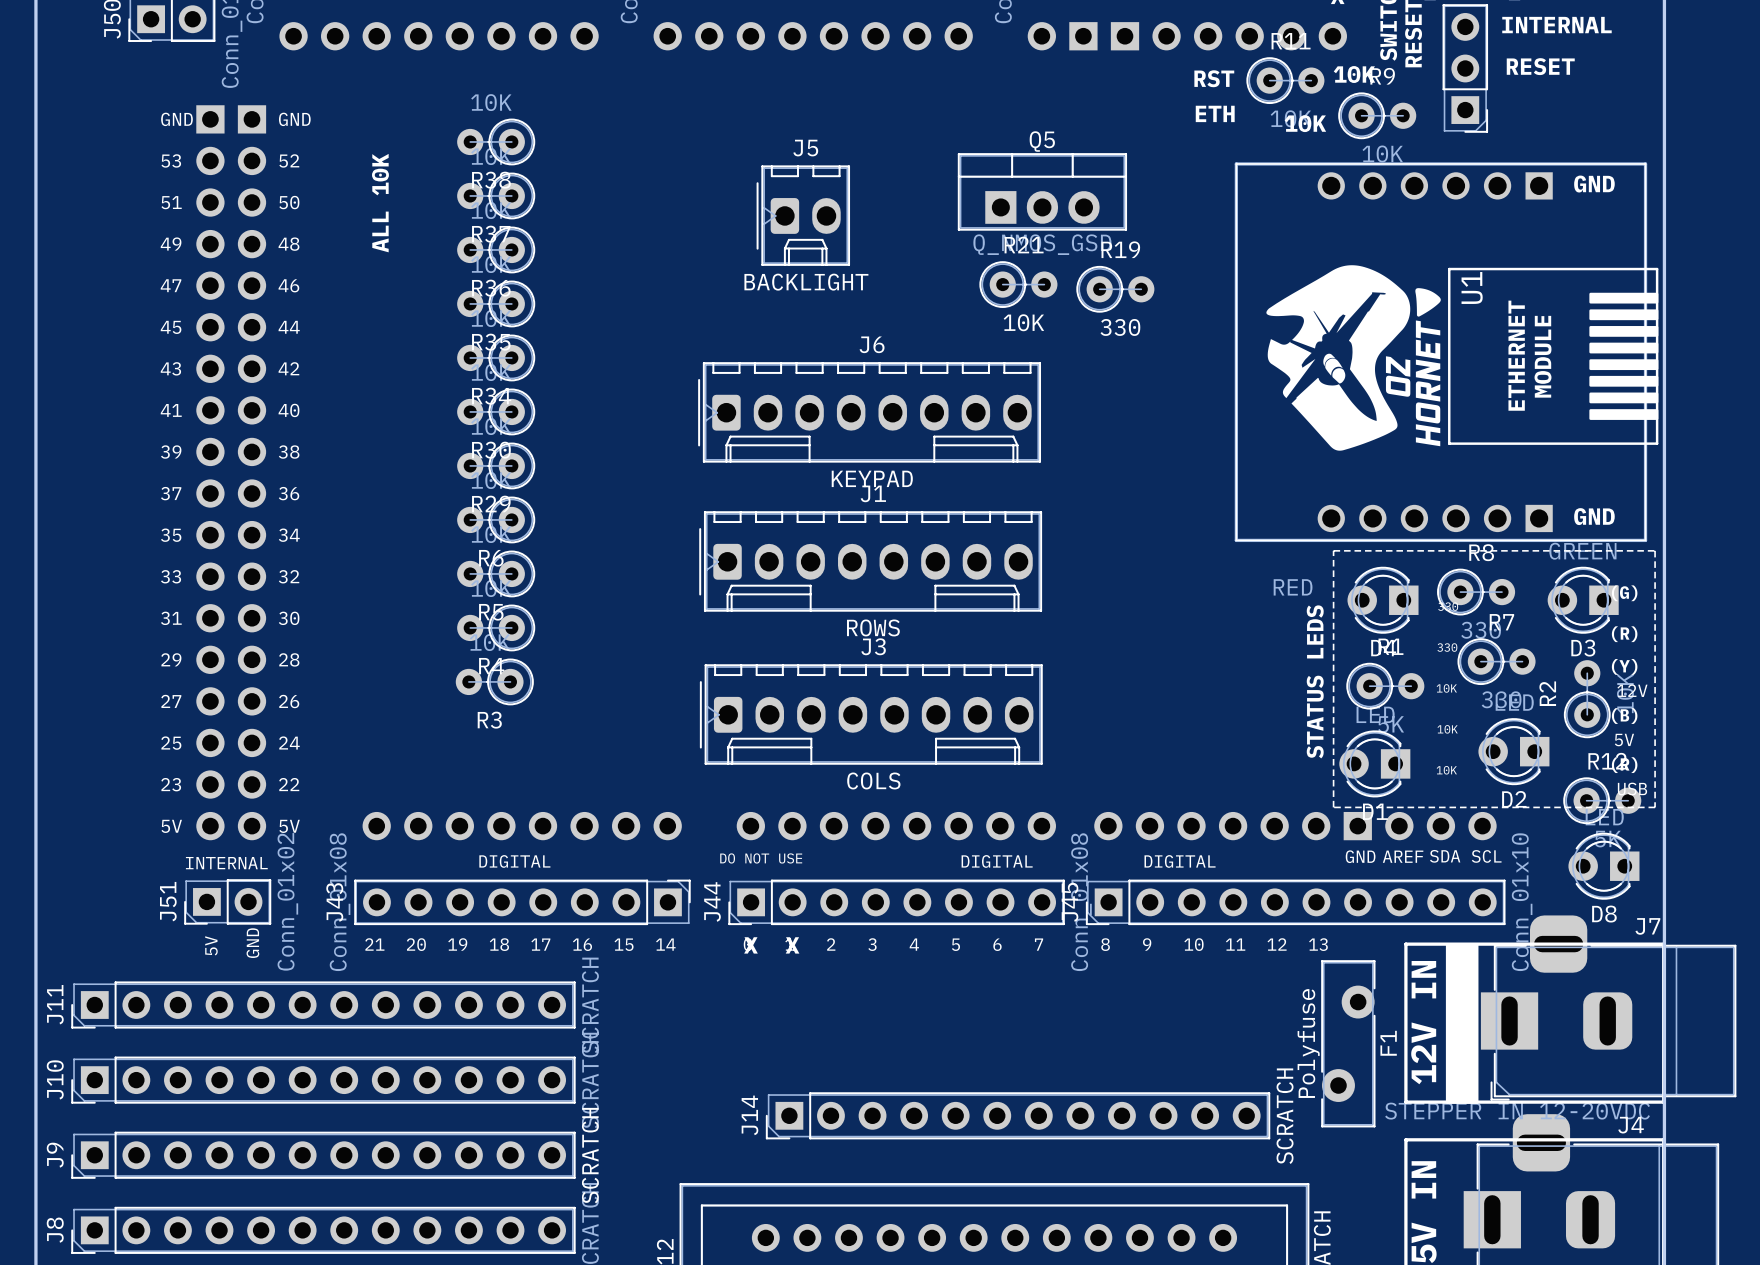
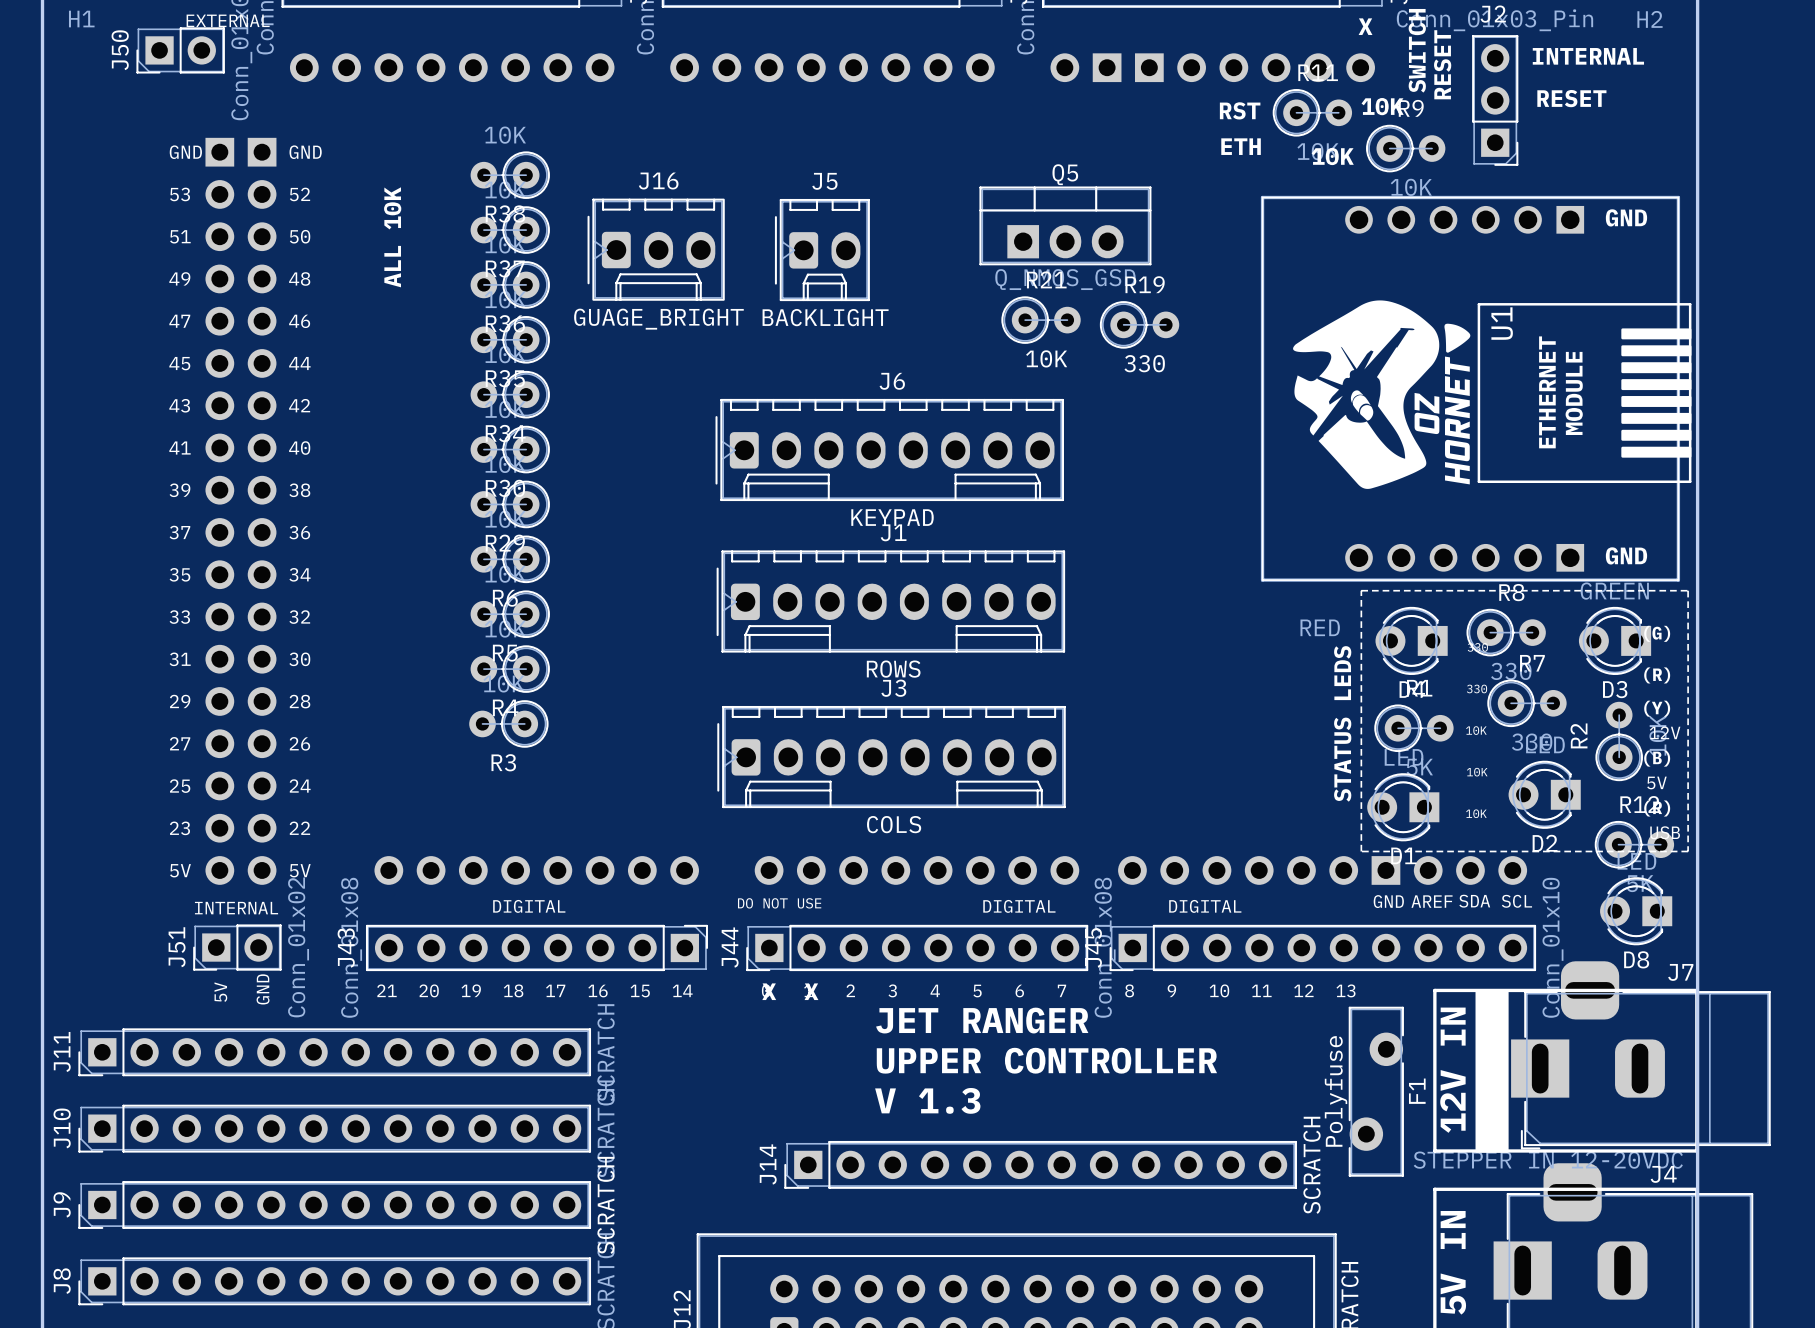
J16: none -> GUAGE_BRIGHT (656, 249)
text: none -> JET RANGER (982, 1020)
text: none -> UPPER CONTROLLER (1046, 1060)
text: none -> V 1.3 (927, 1100)

